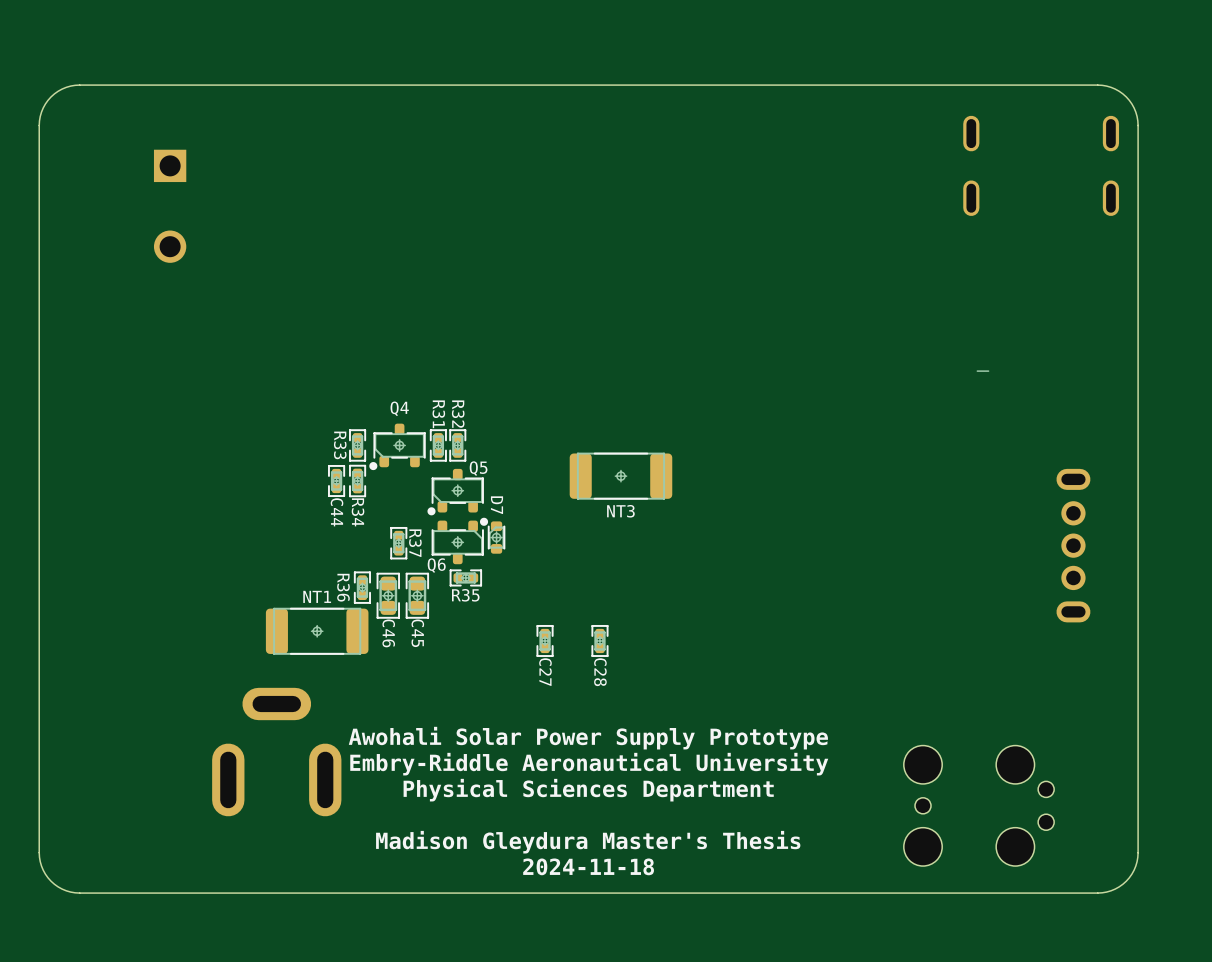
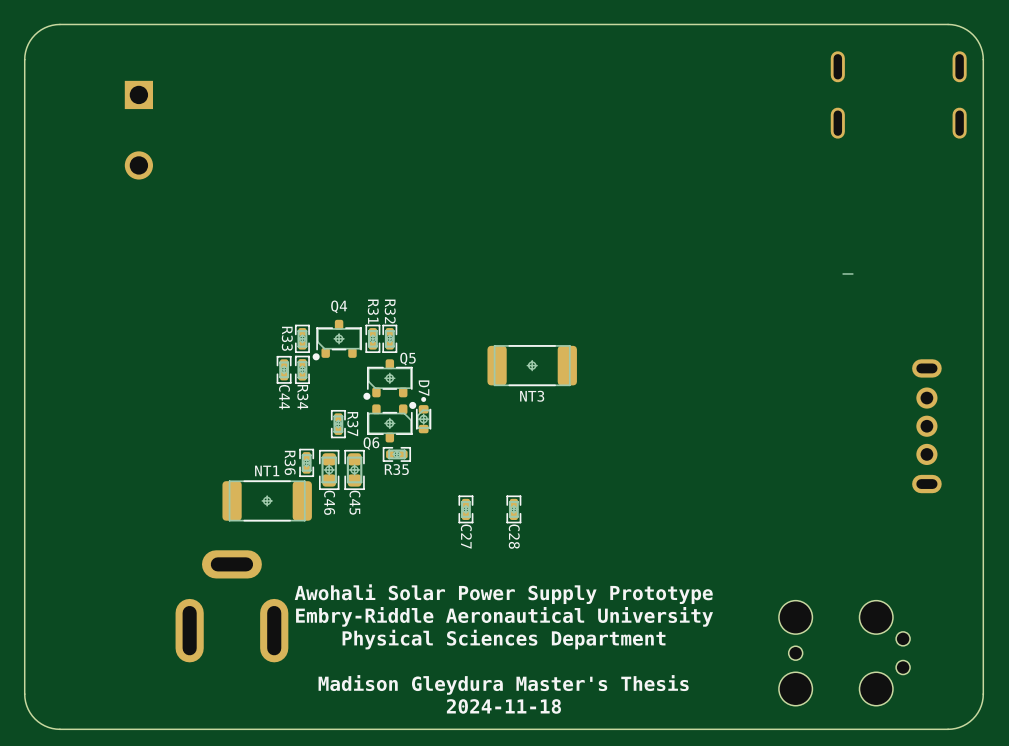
D7 footprint: [487, 521, 506, 554] -> [415, 396, 432, 434]

